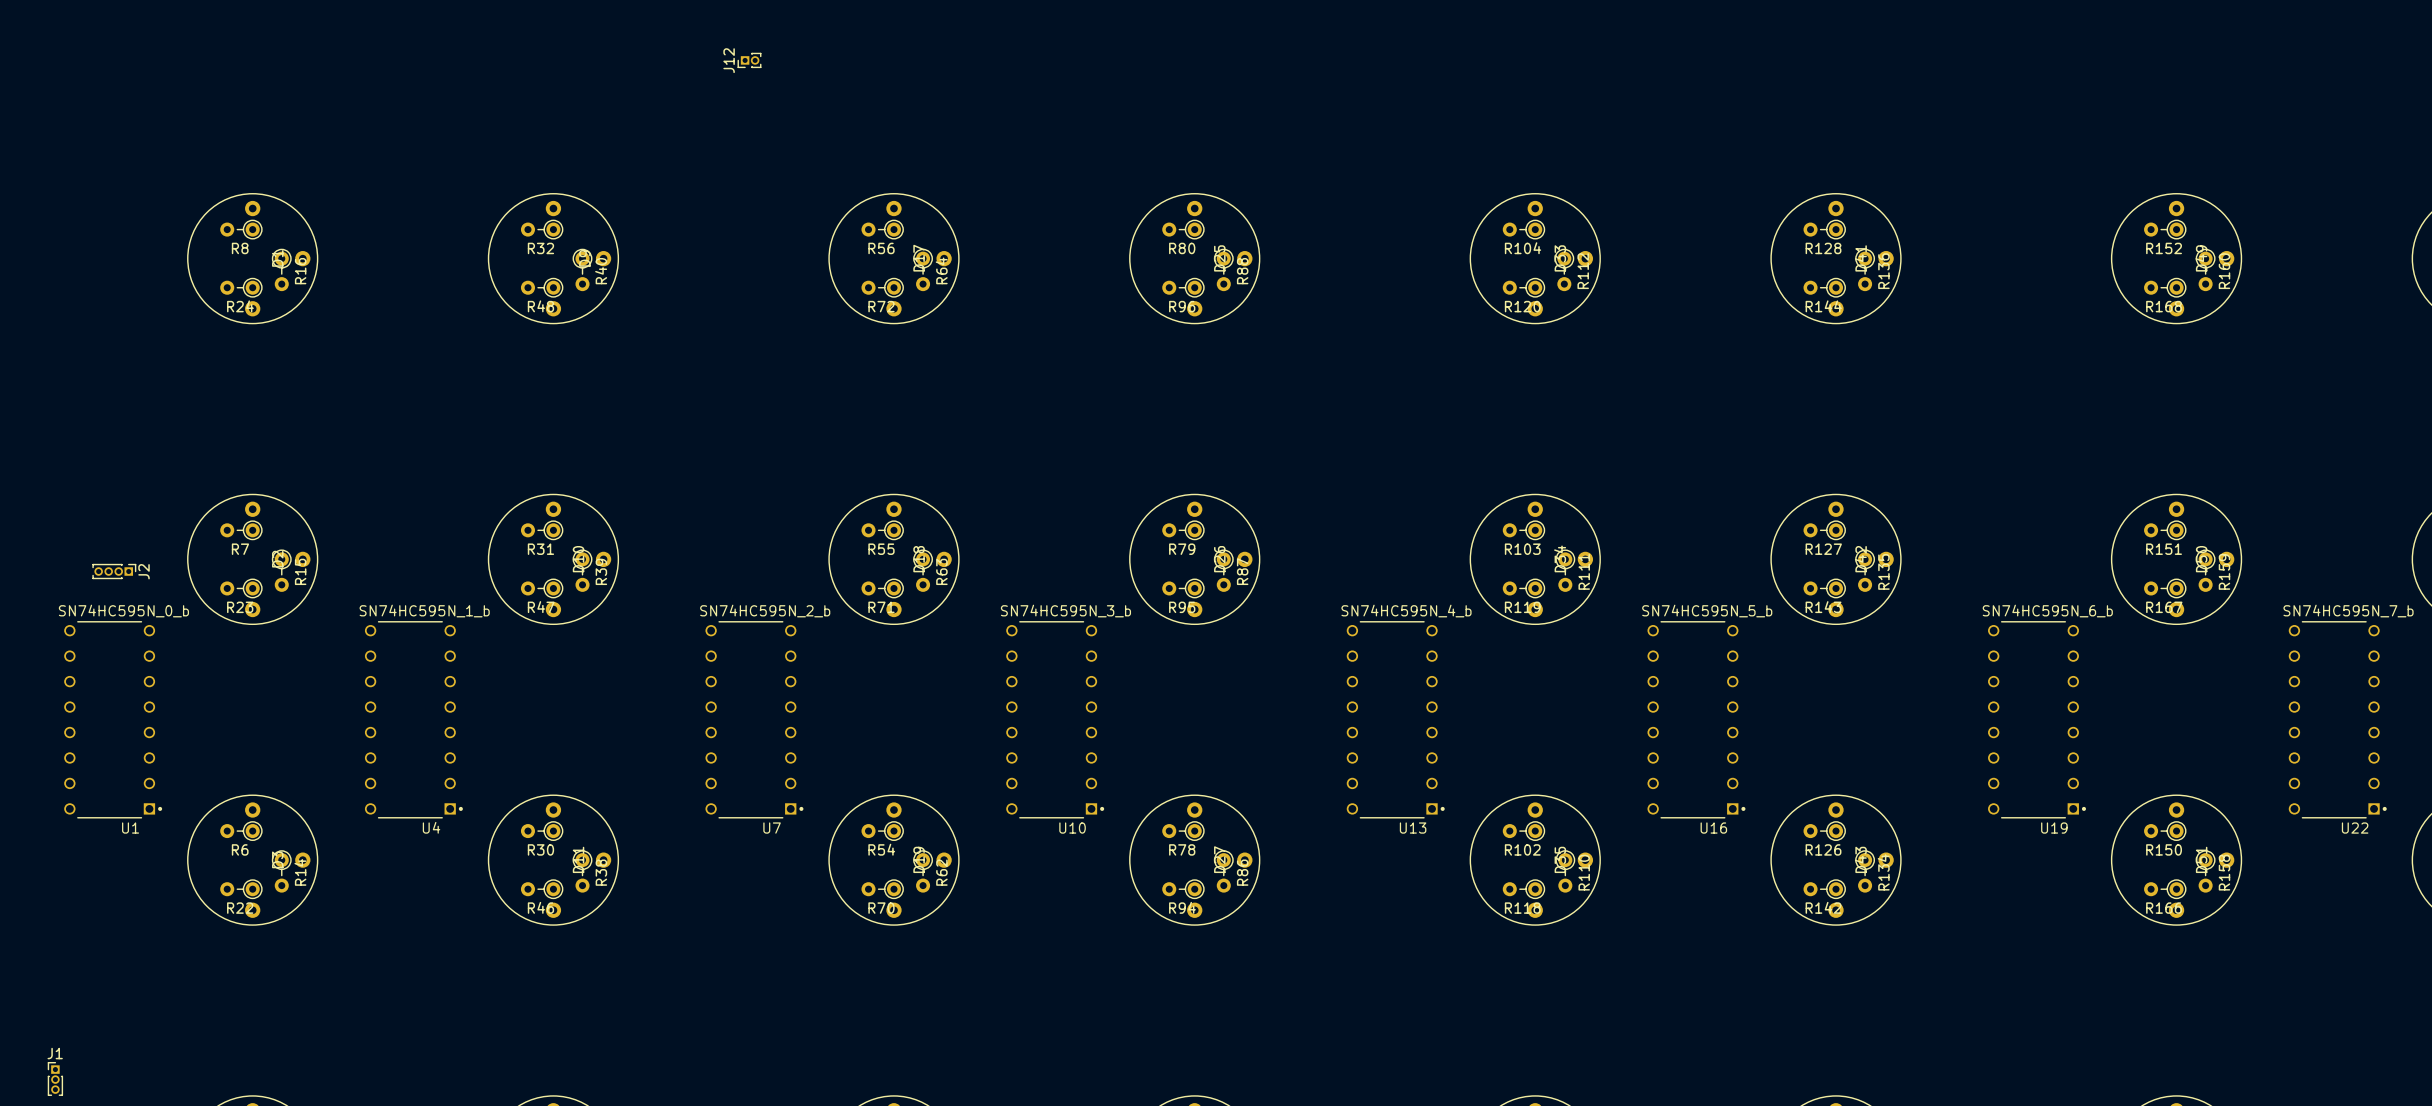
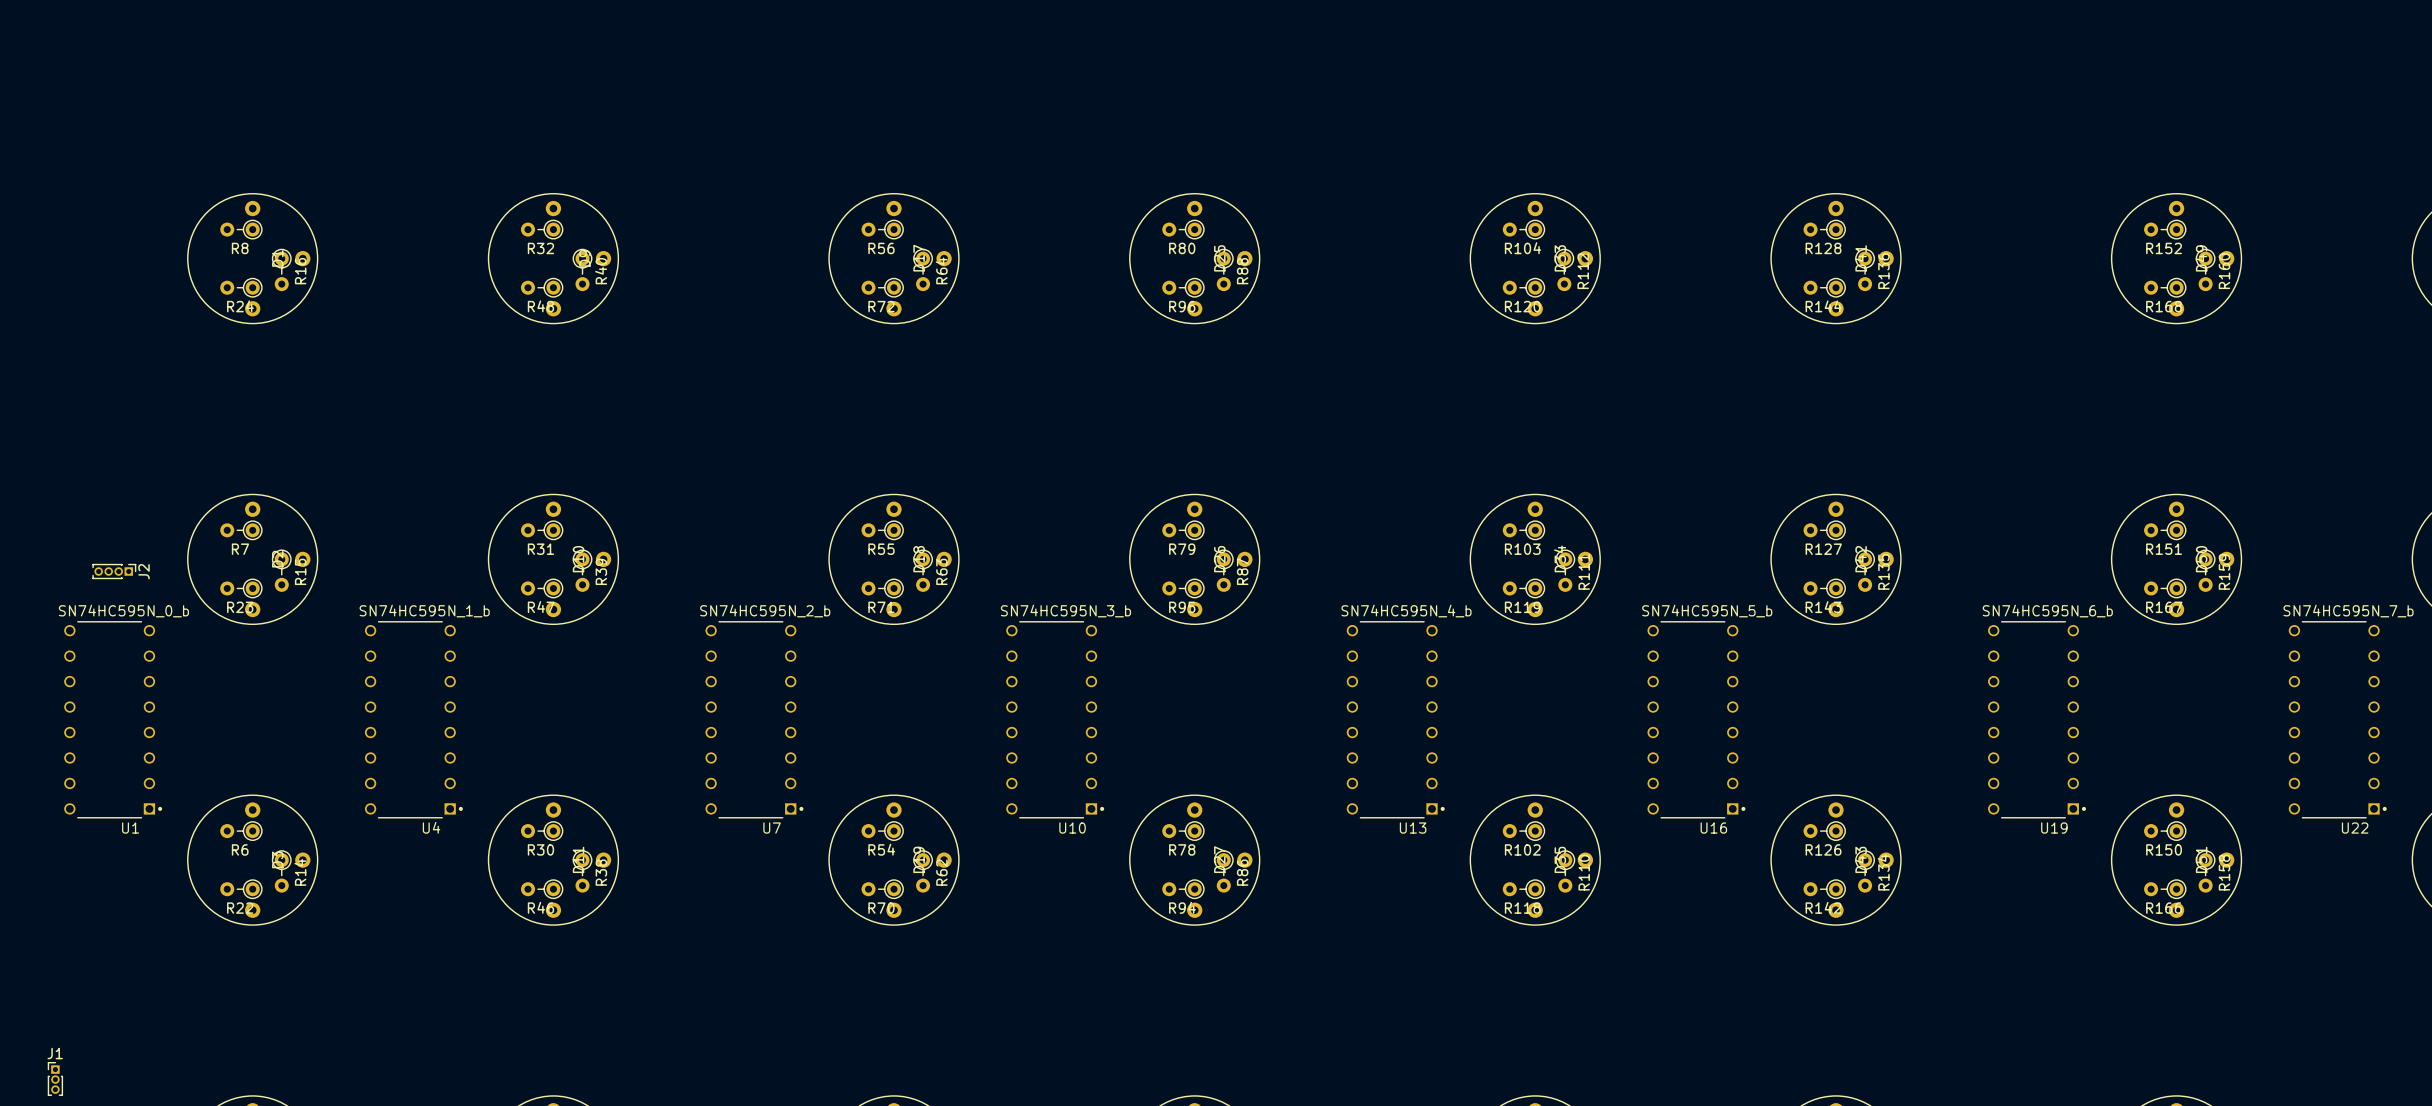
J12: (749, 60) -> none

